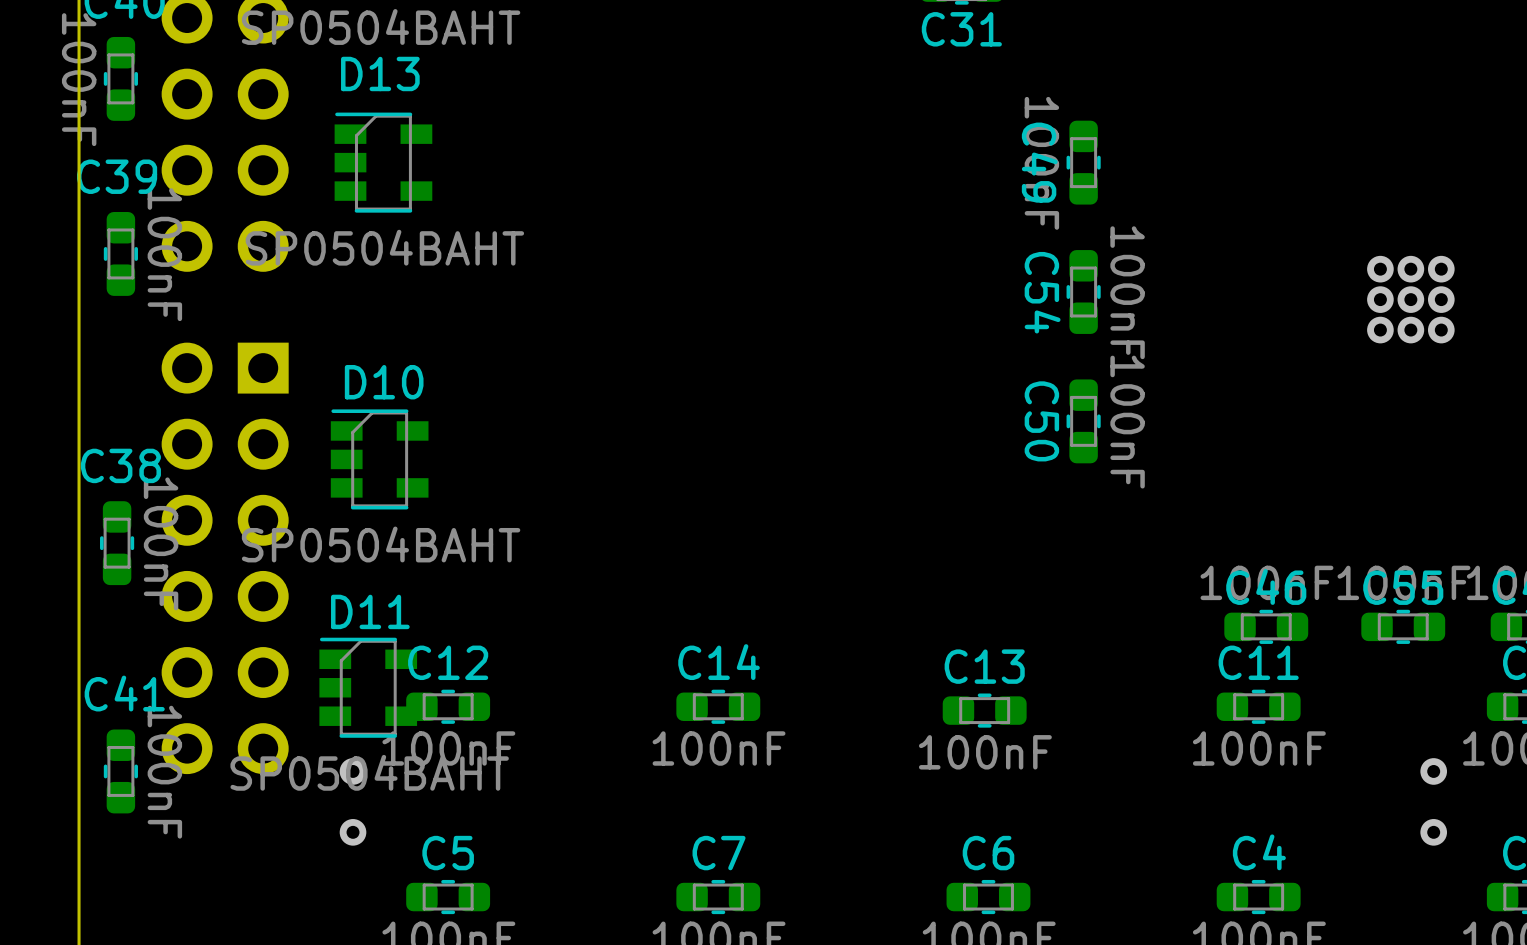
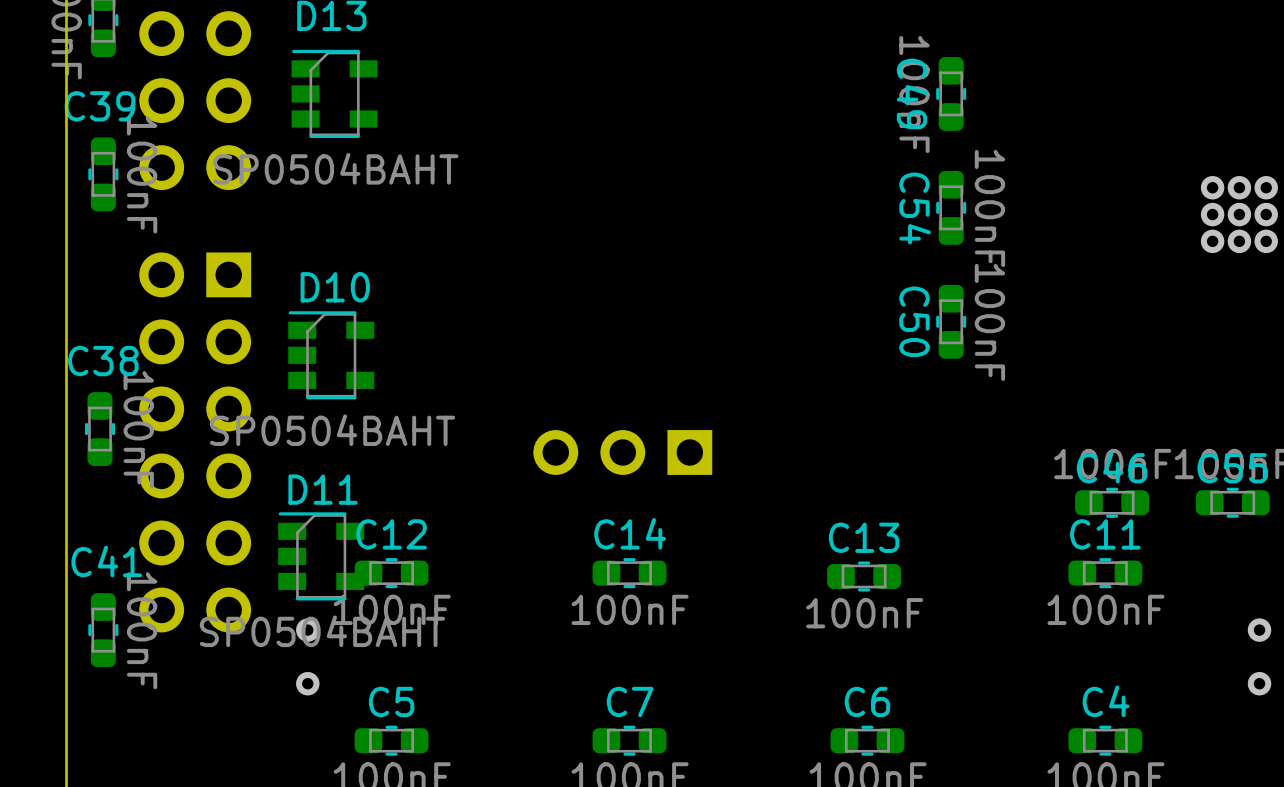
part: none -> (622, 452)

